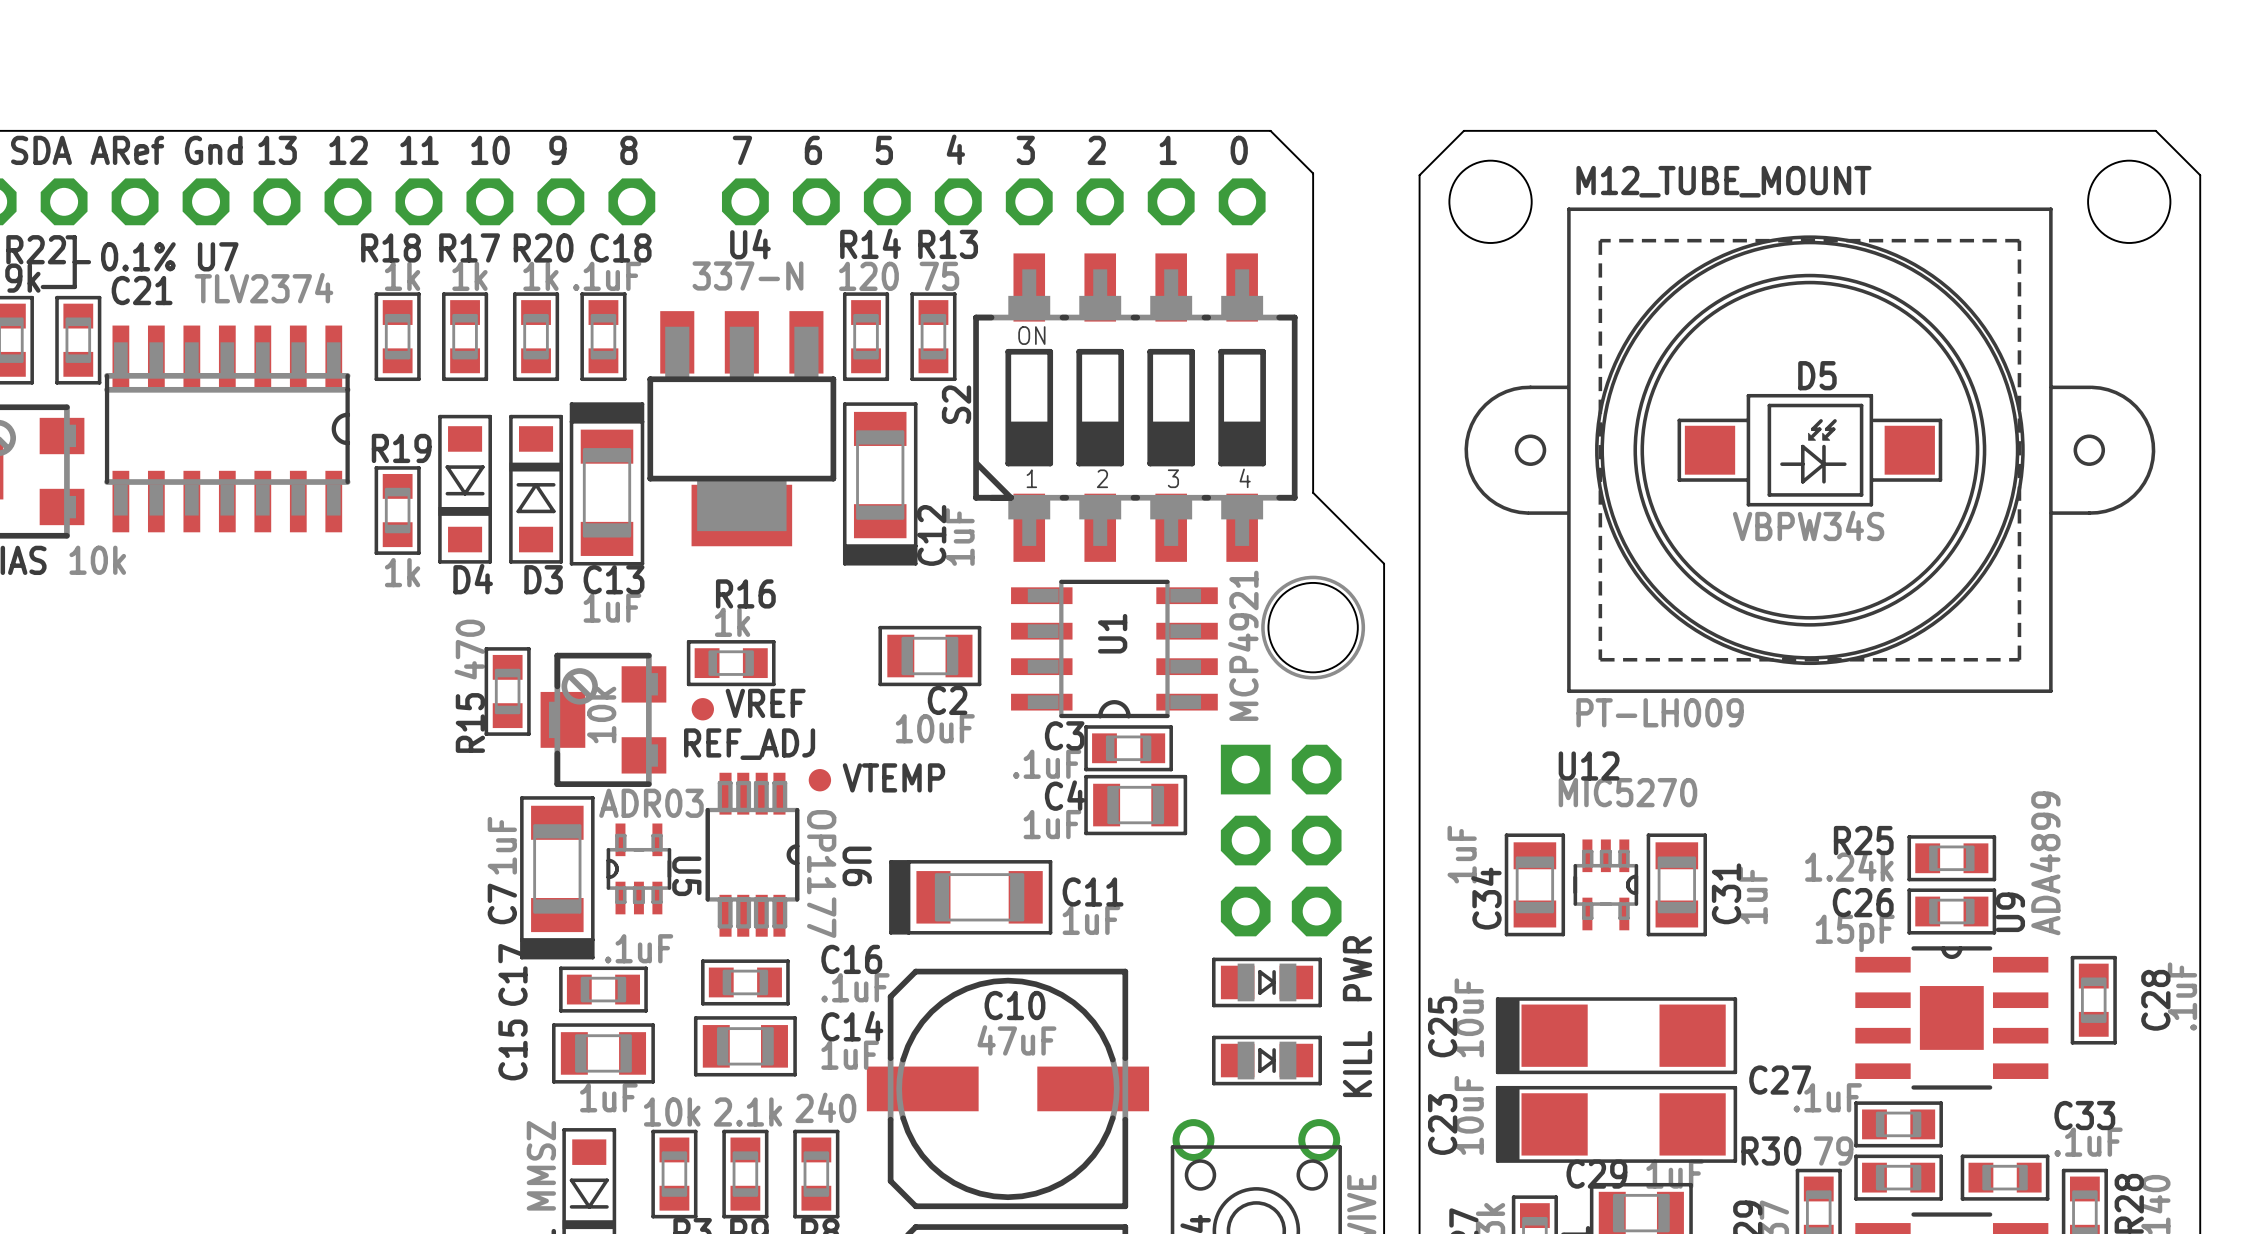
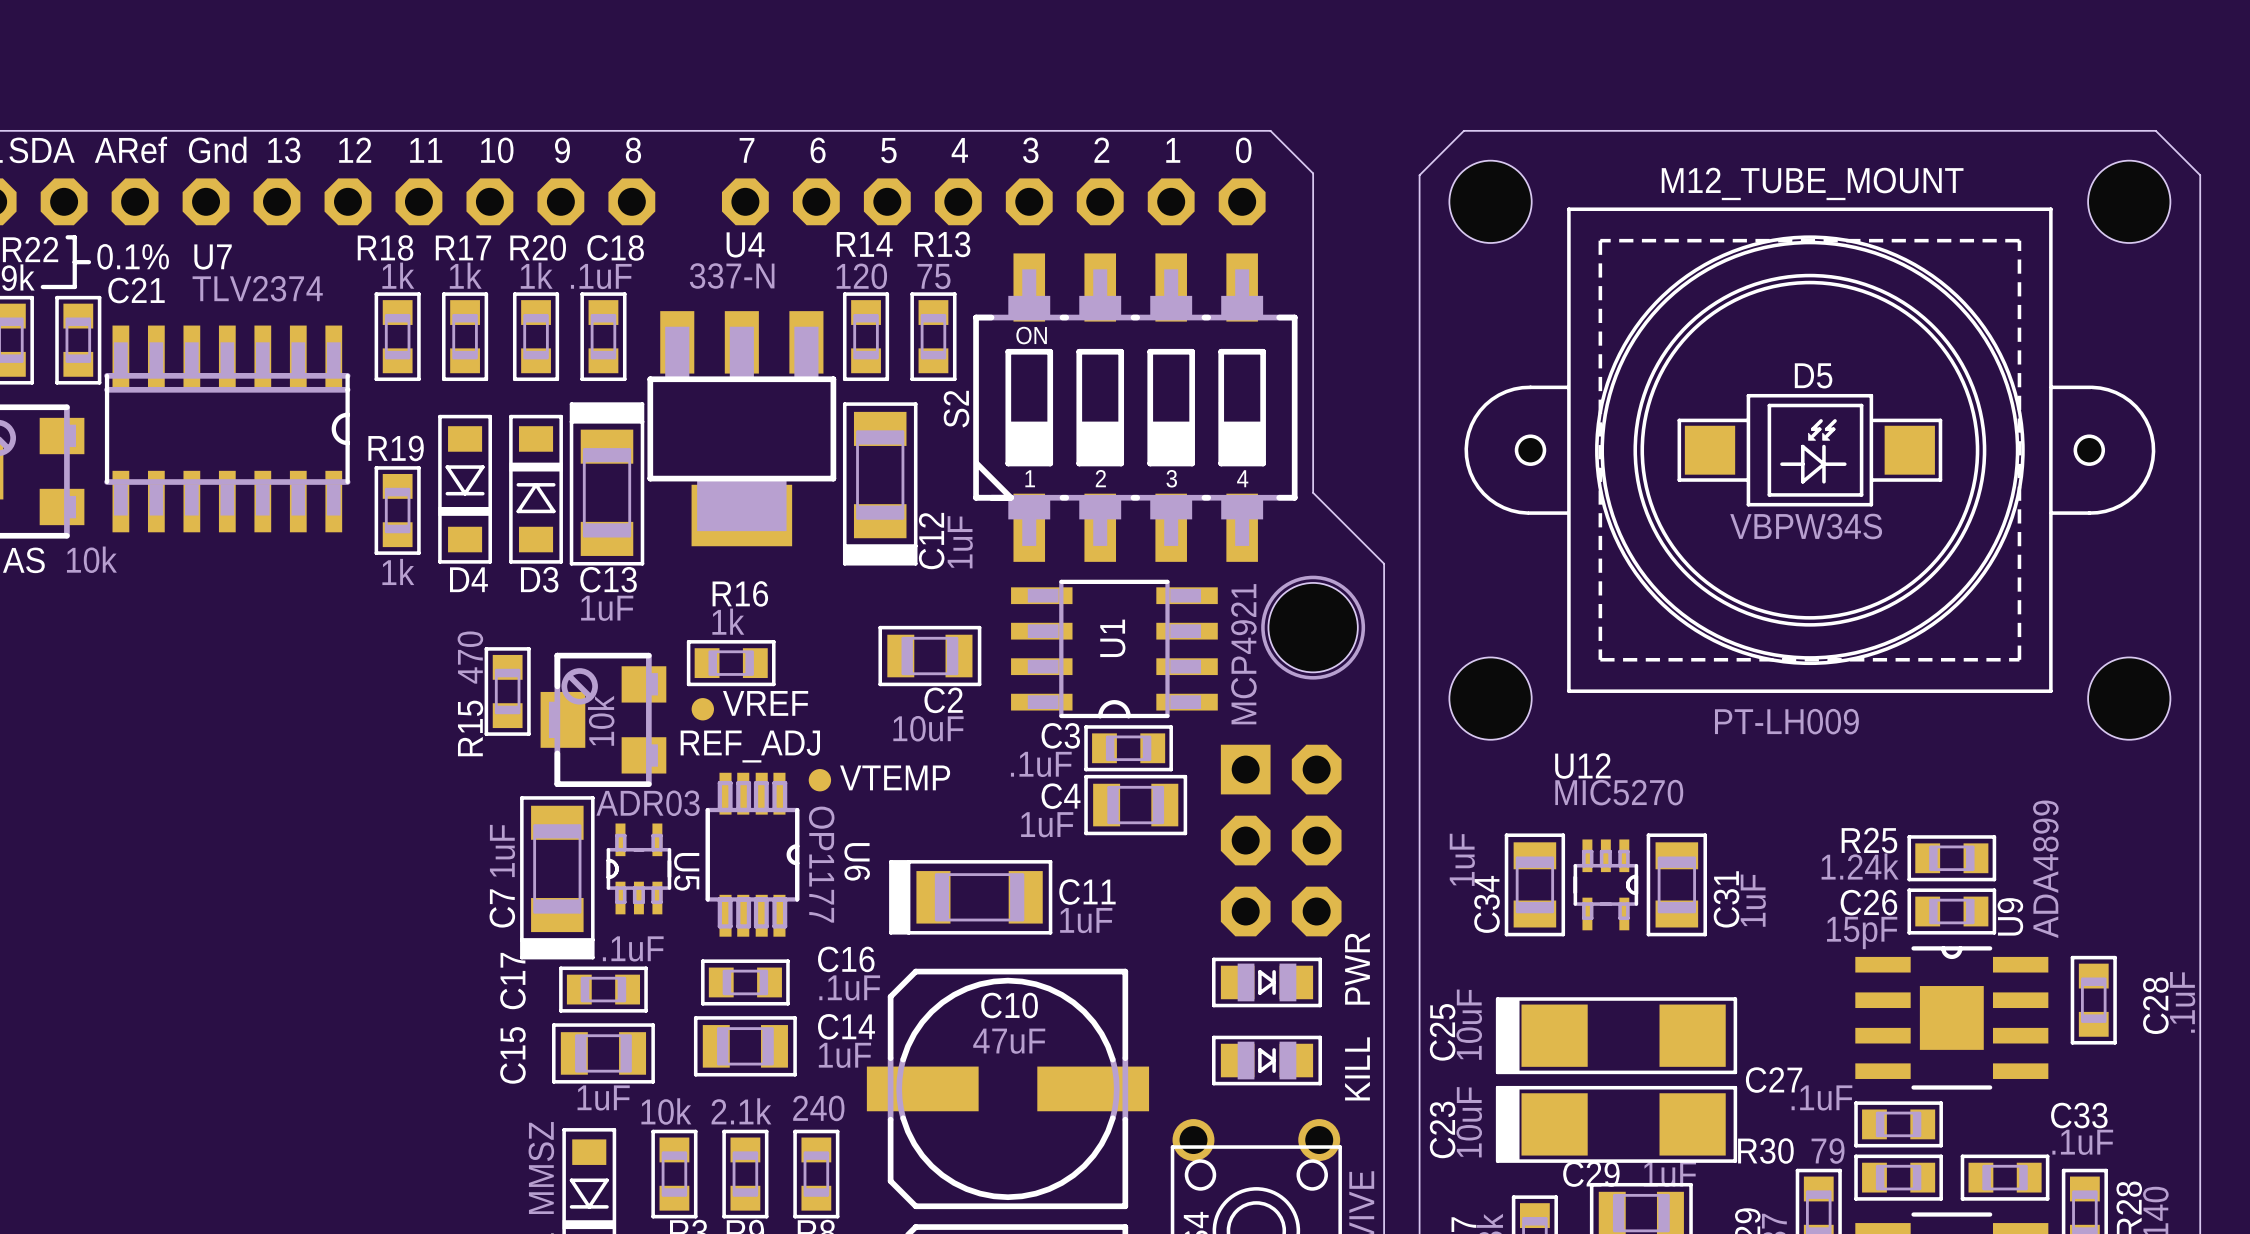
M12_TUBE_MOUNT name position: M12_TUBE_MOUNT (1723, 181) -> M12_TUBE_MOUNT (1812, 183)
hole: none -> (1490, 698)
hole: none -> (2129, 698)
M12_TUBE_MOUNT value position: PT-LH009 (1660, 712) -> PT-LH009 (1786, 721)

